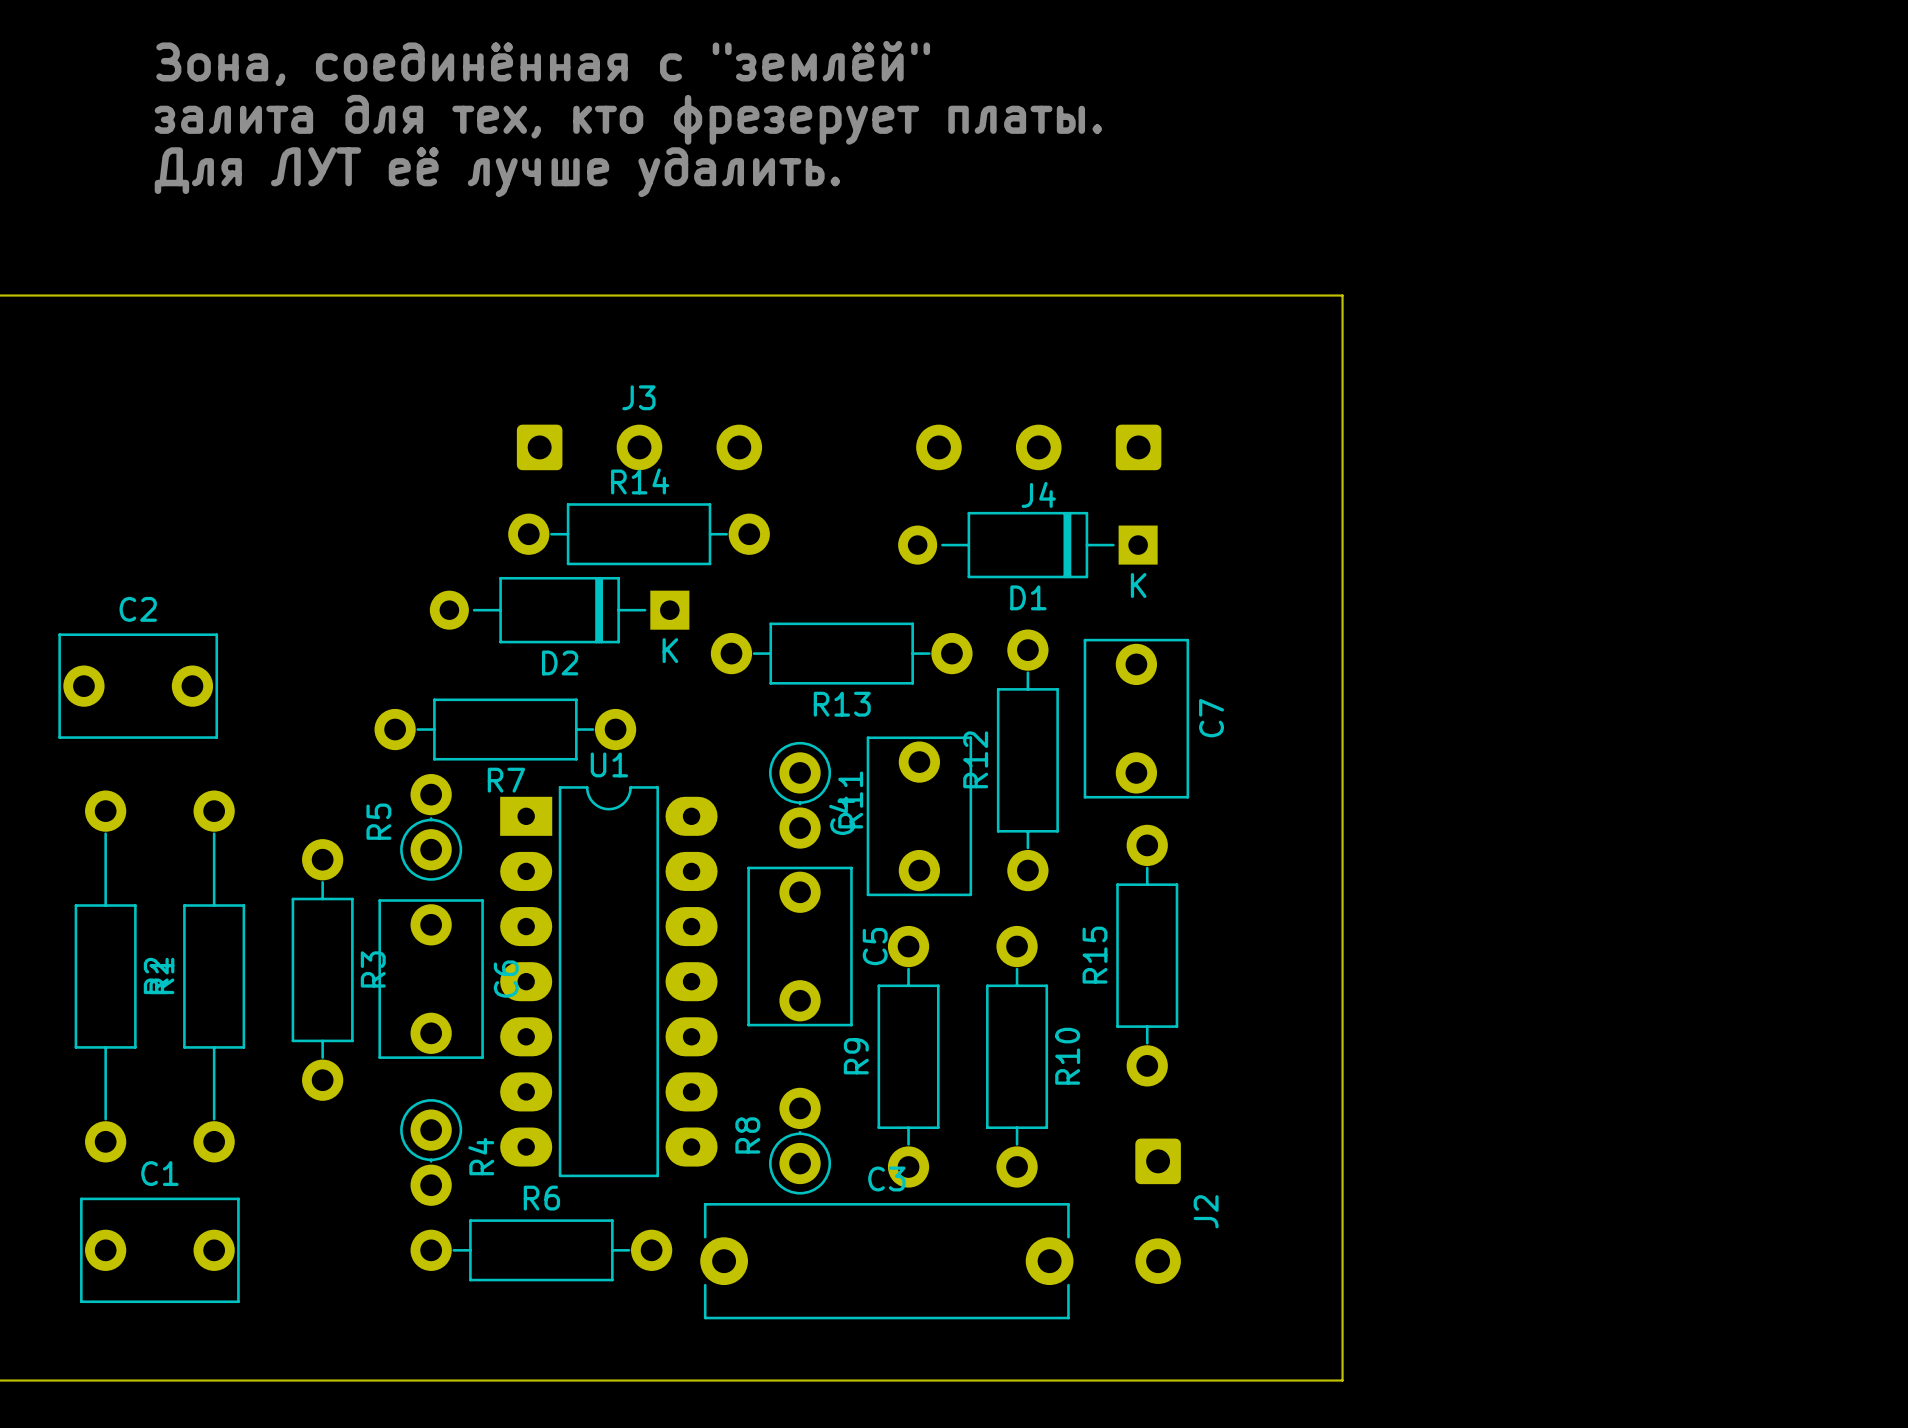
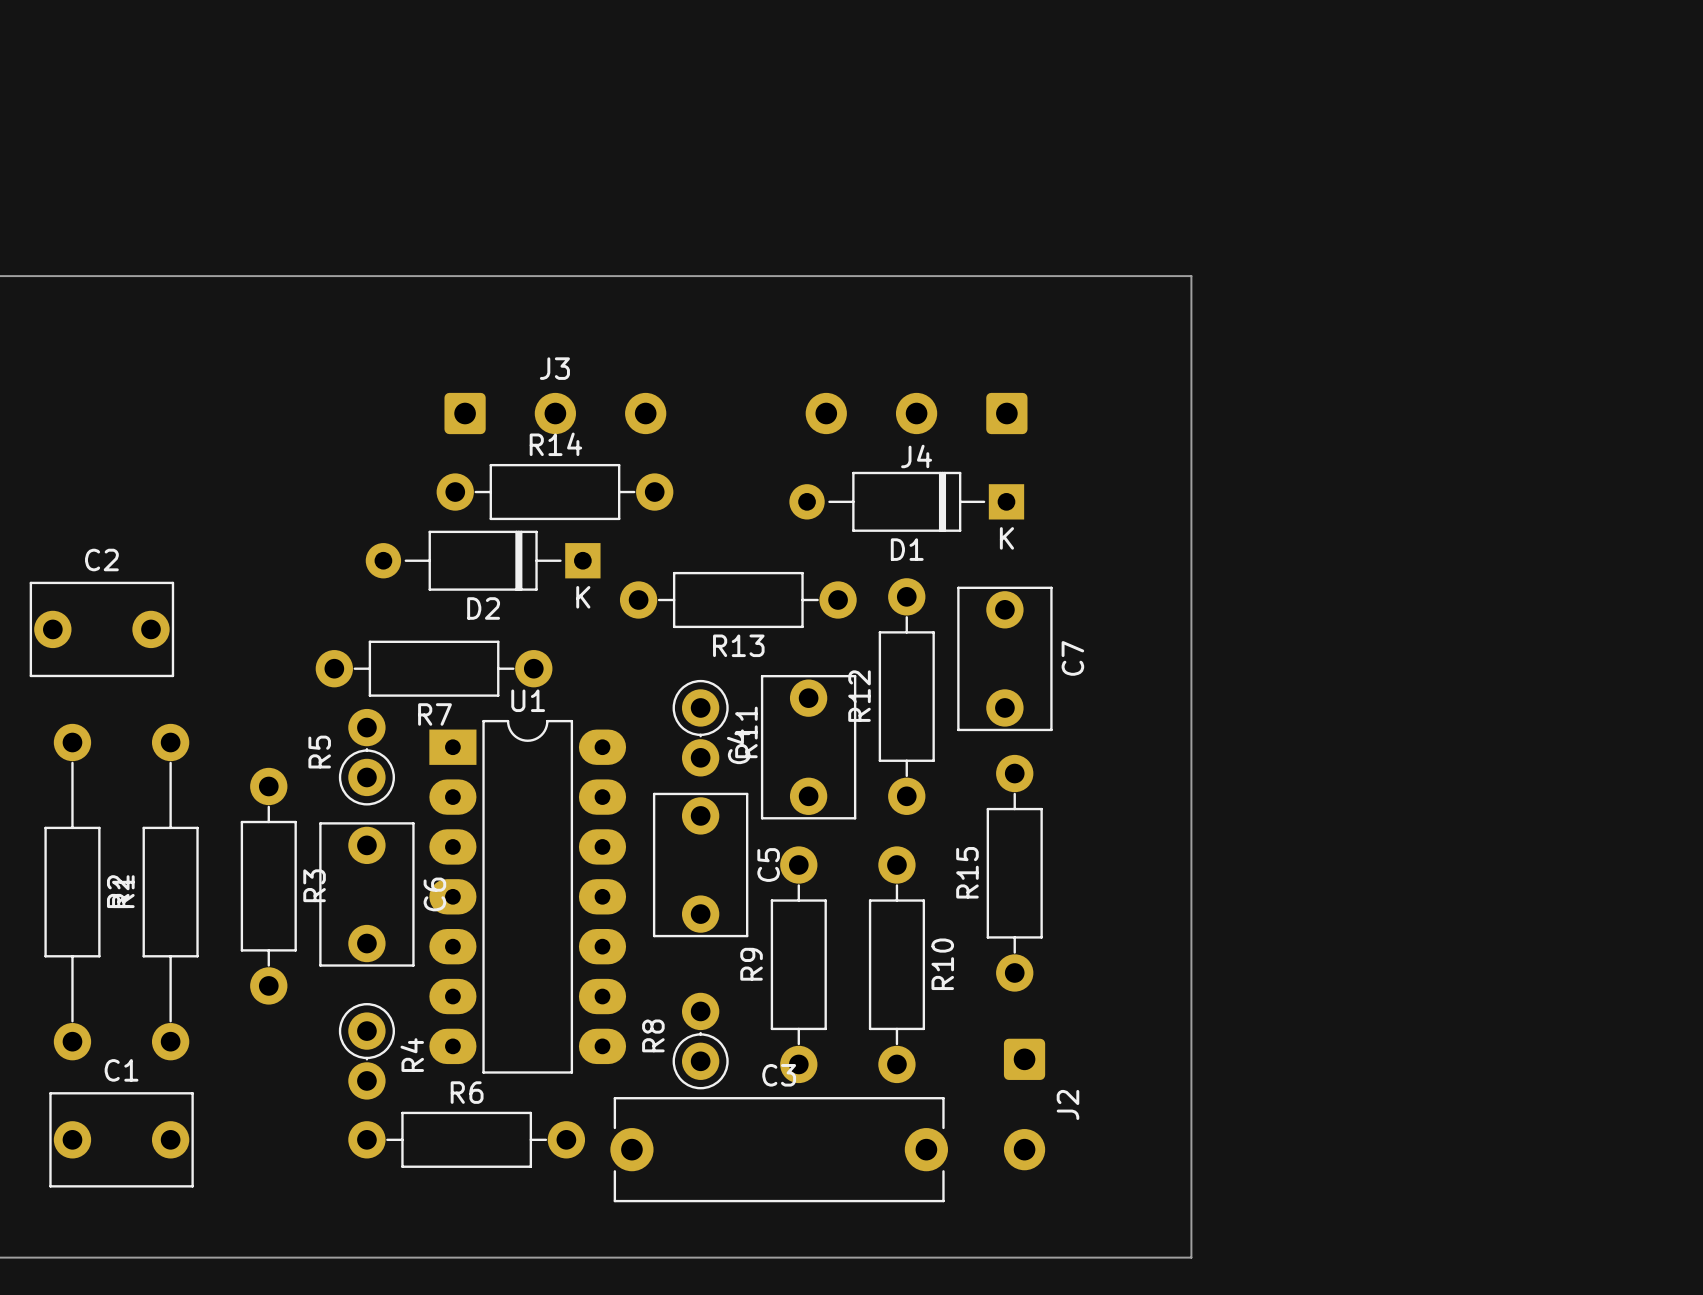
text: Зона, соединённая с "землёй" (543, 63) -> none
text: залита для тех, кто фрезерует платы. (628, 119) -> none
text: Для ЛУТ её лучше удалить. (497, 172) -> none

